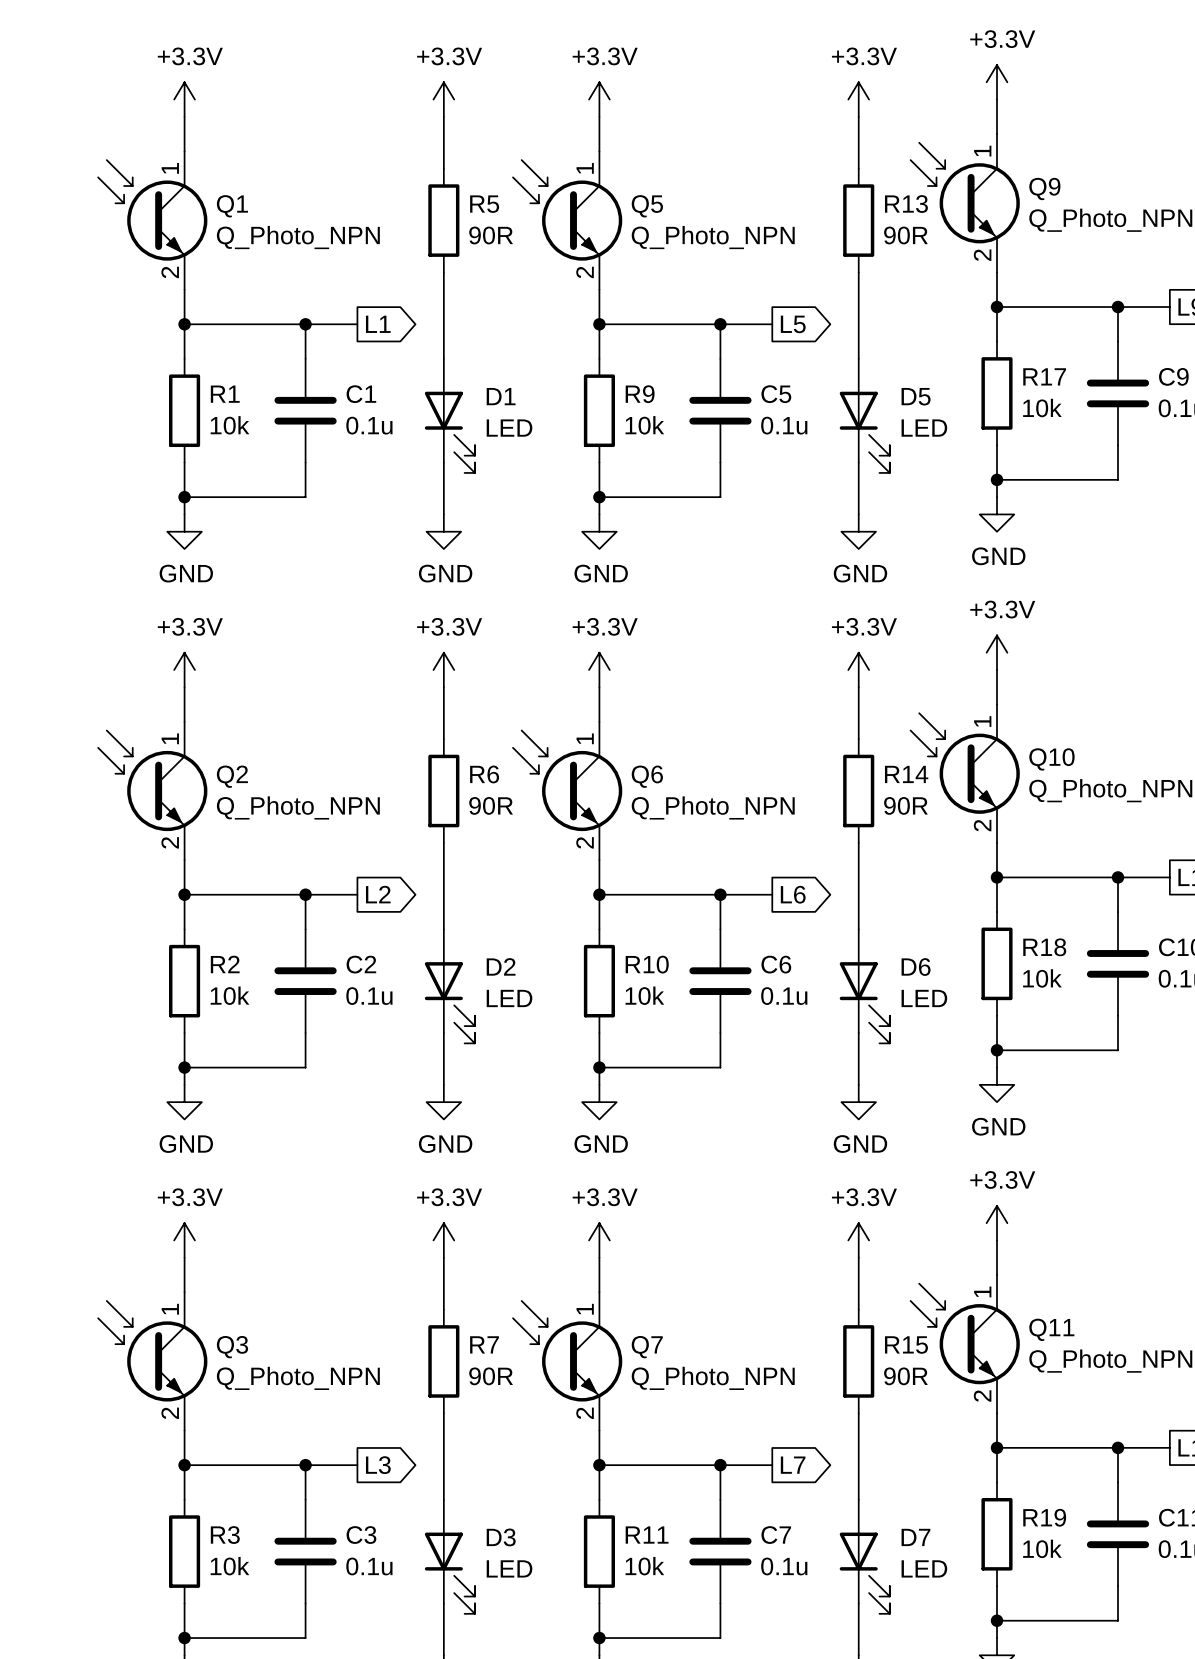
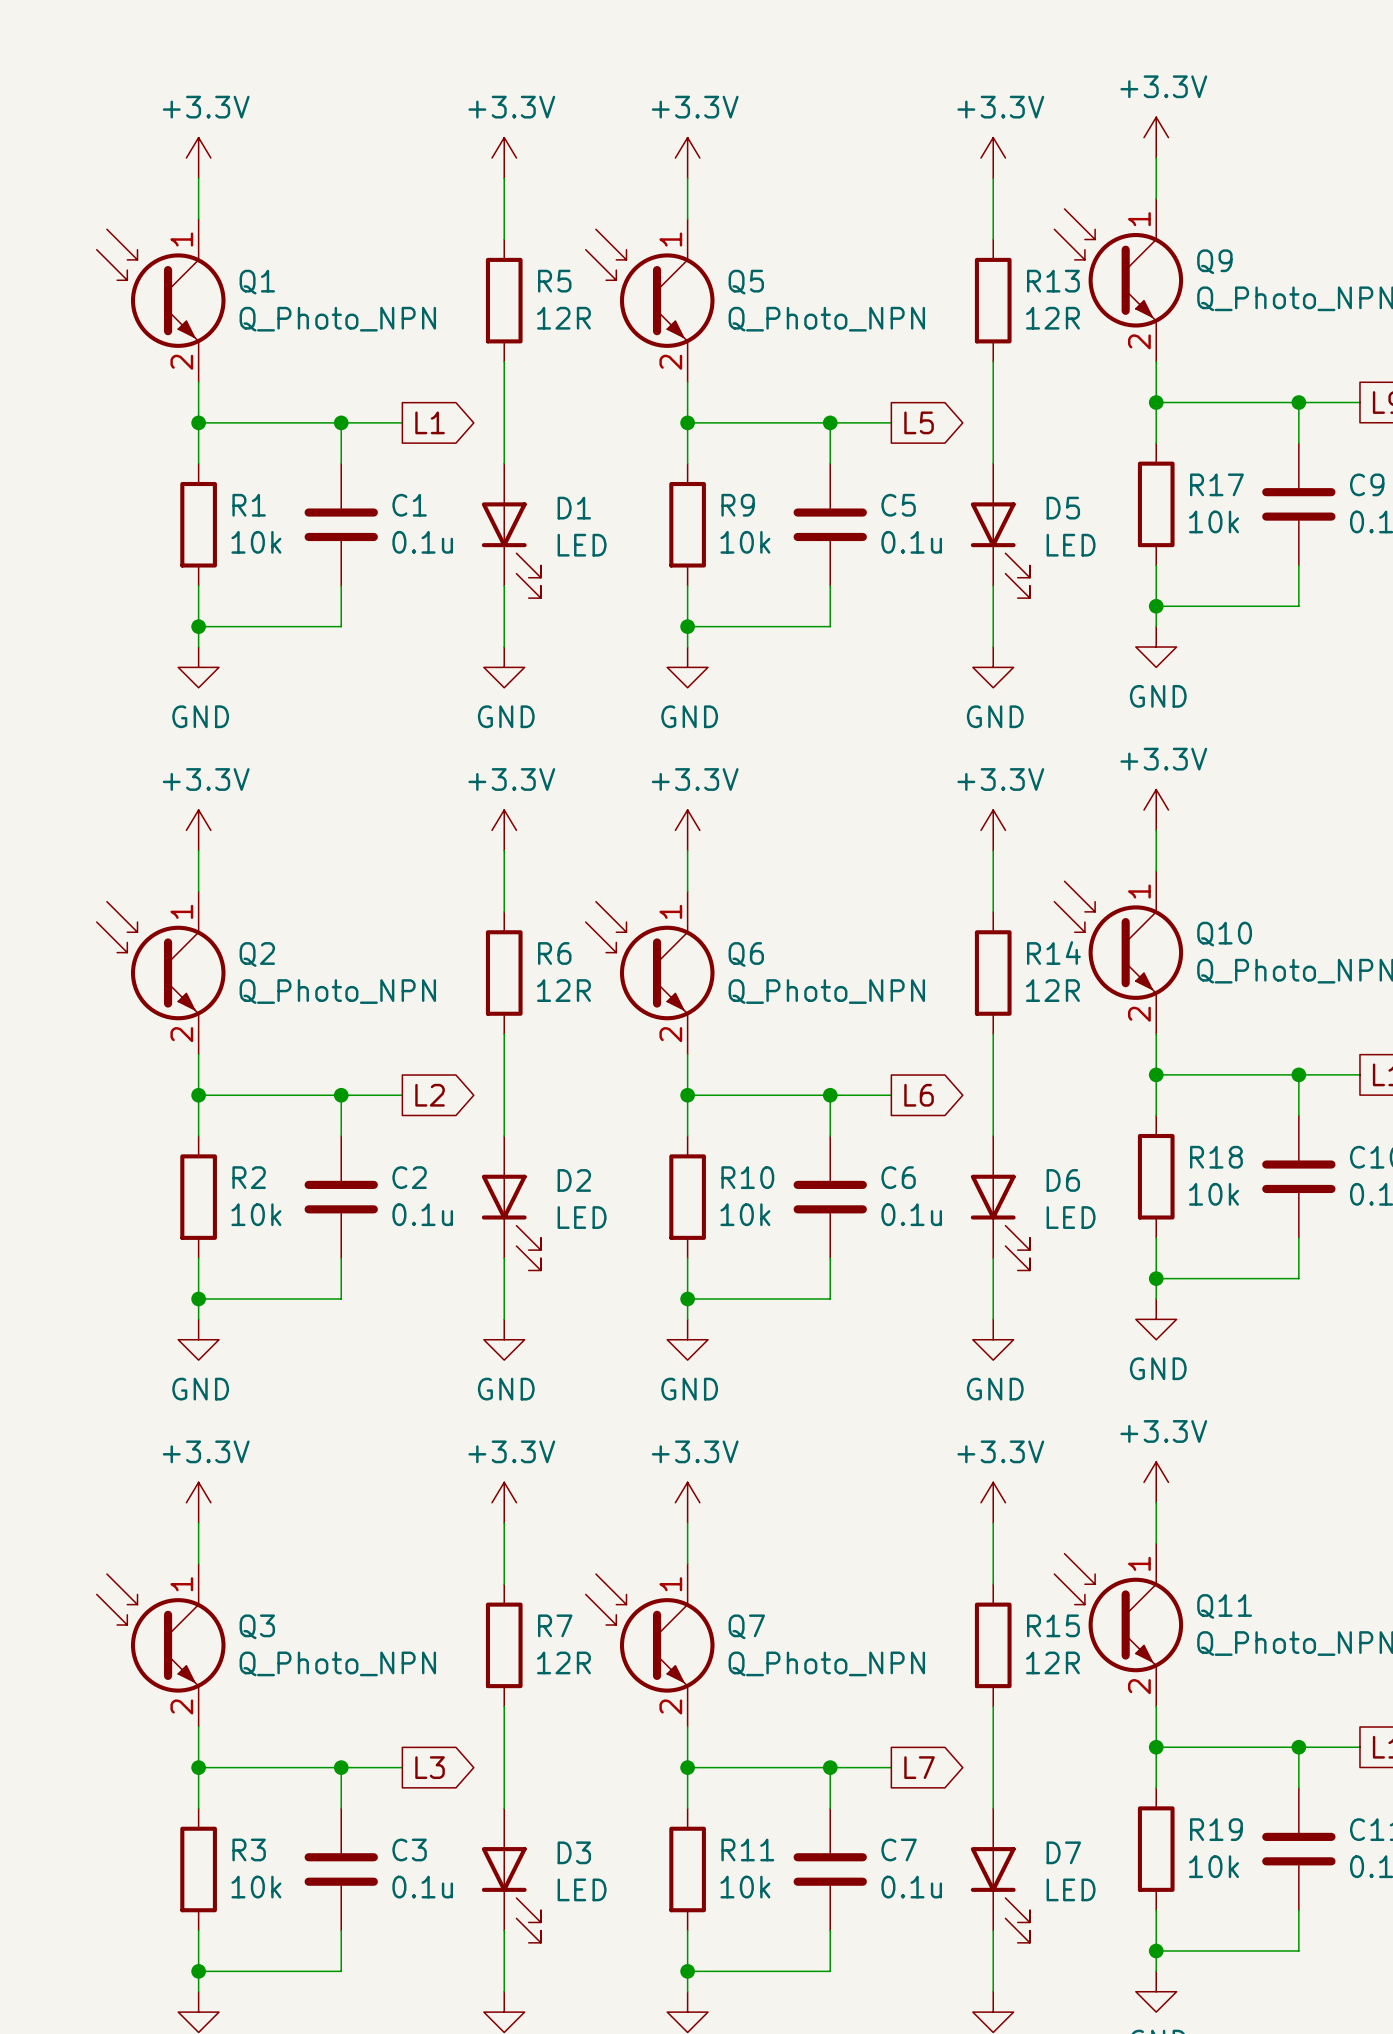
R5 value: 90R (491, 235) -> 12R (563, 318)
R13 value: 90R (905, 235) -> 12R (1052, 318)
R6 value: 90R (491, 805) -> 12R (563, 990)
R14 value: 90R (905, 805) -> 12R (1052, 990)
R7 value: 90R (491, 1376) -> 12R (563, 1662)
R15 value: 90R (905, 1376) -> 12R (1052, 1662)

